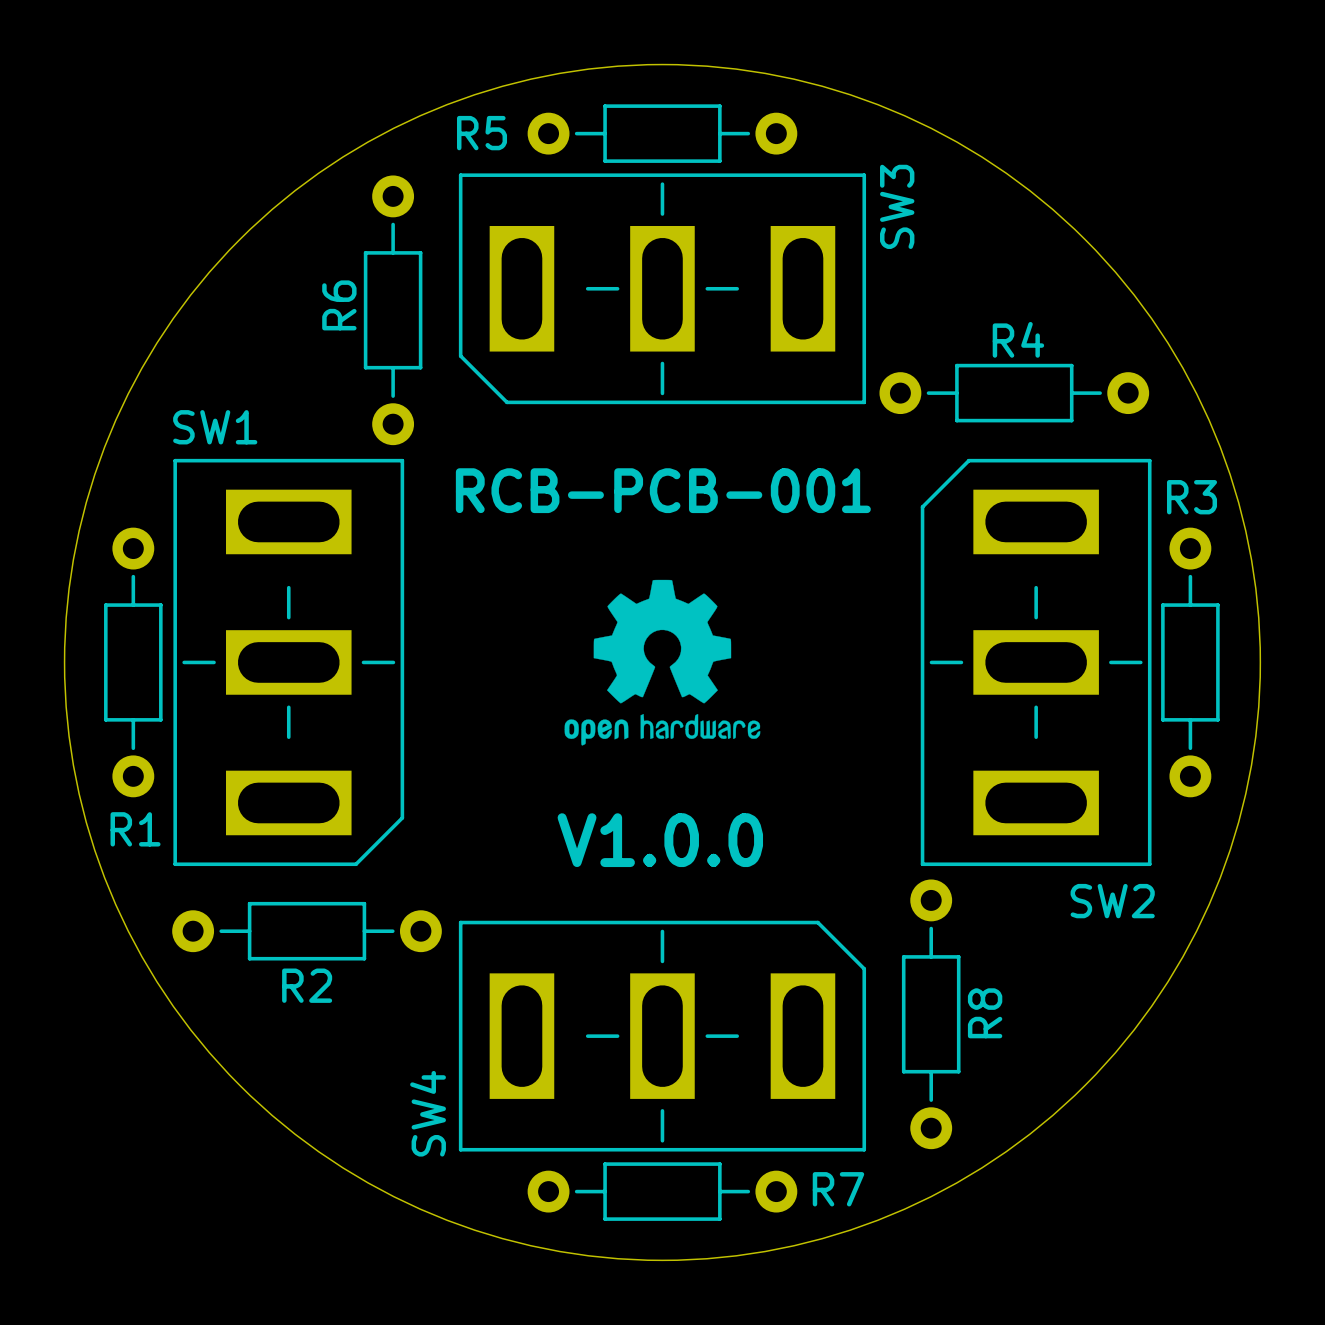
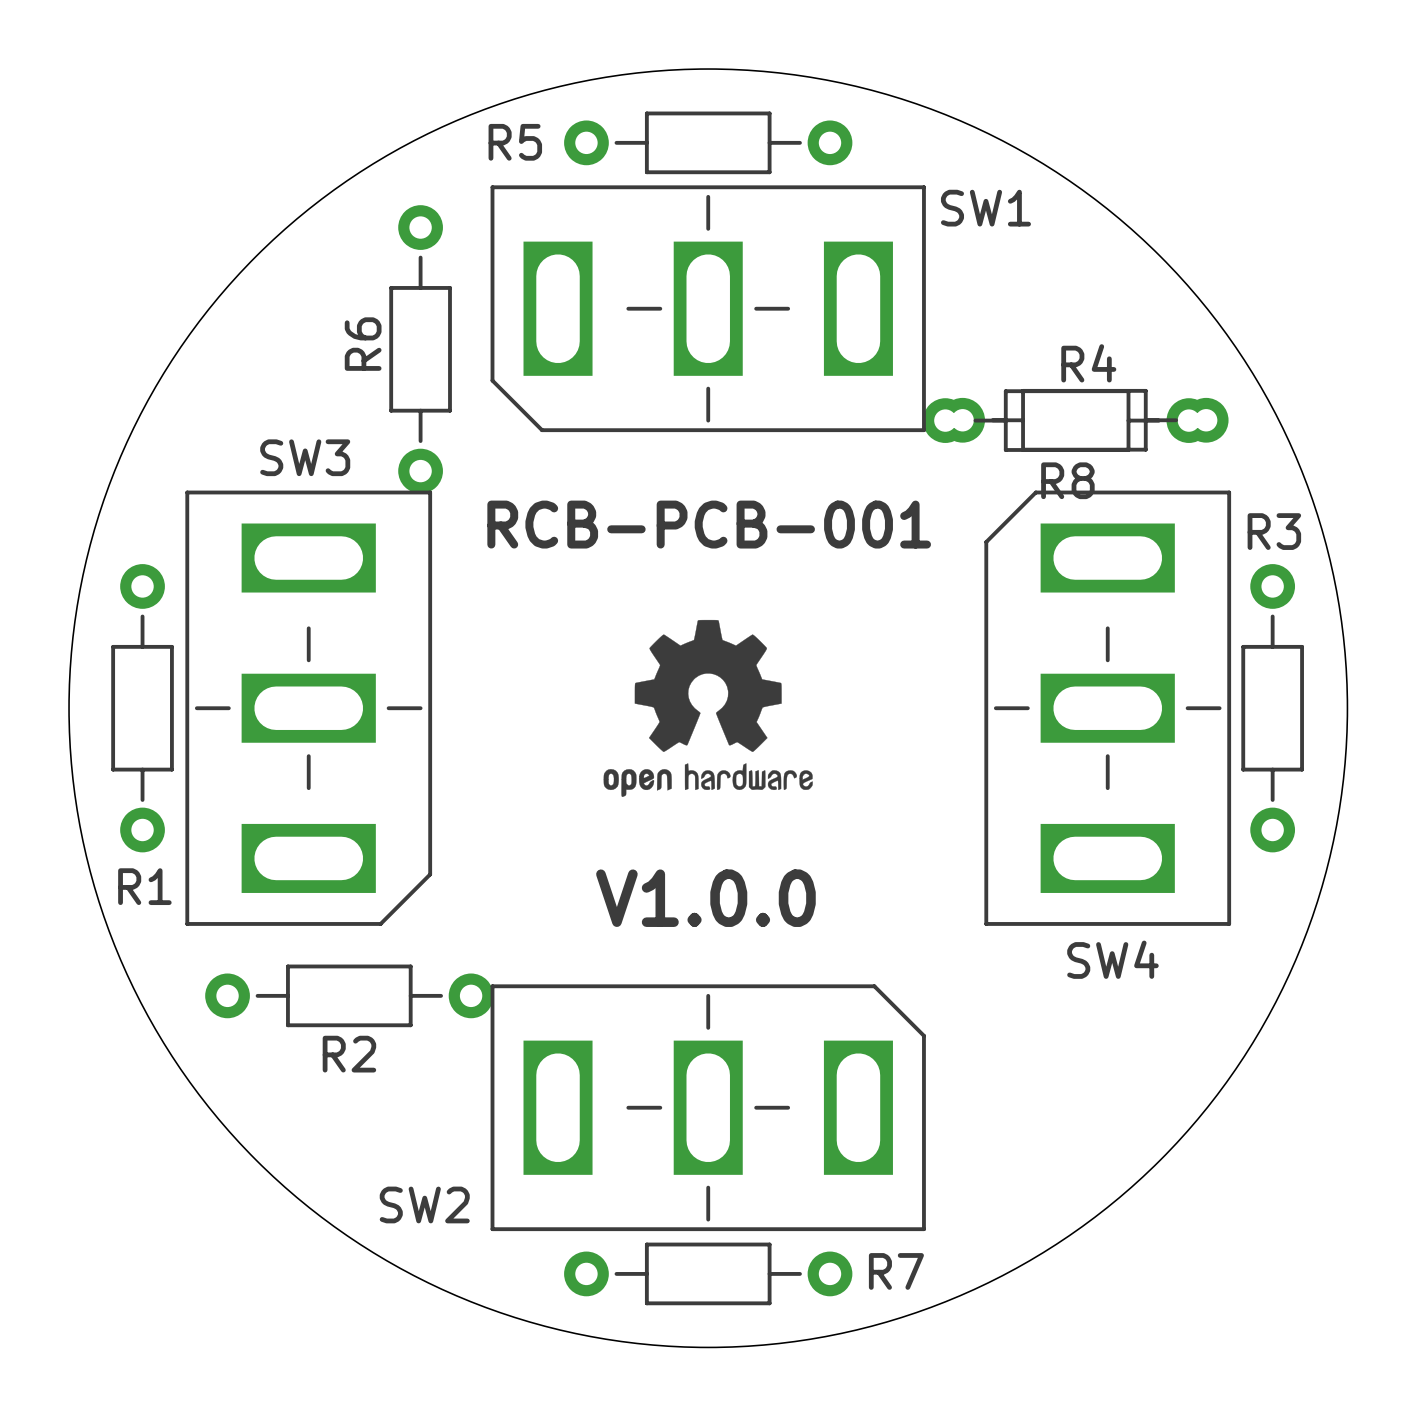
SW3 name: SW3 (897, 206) -> SW1 (985, 208)
R6 position: (393, 310) -> (420, 349)
SW1 name: SW1 (215, 427) -> SW3 (305, 457)
SW2 name: SW2 (1112, 901) -> SW4 (1112, 959)
R2 position: (307, 931) -> (349, 995)
R8 rotation: 0° (931, 1014) -> 90° clockwise (1067, 420)
R8 position: (931, 1014) -> (1067, 420)
SW4 name: SW4 (428, 1113) -> SW2 (424, 1204)

